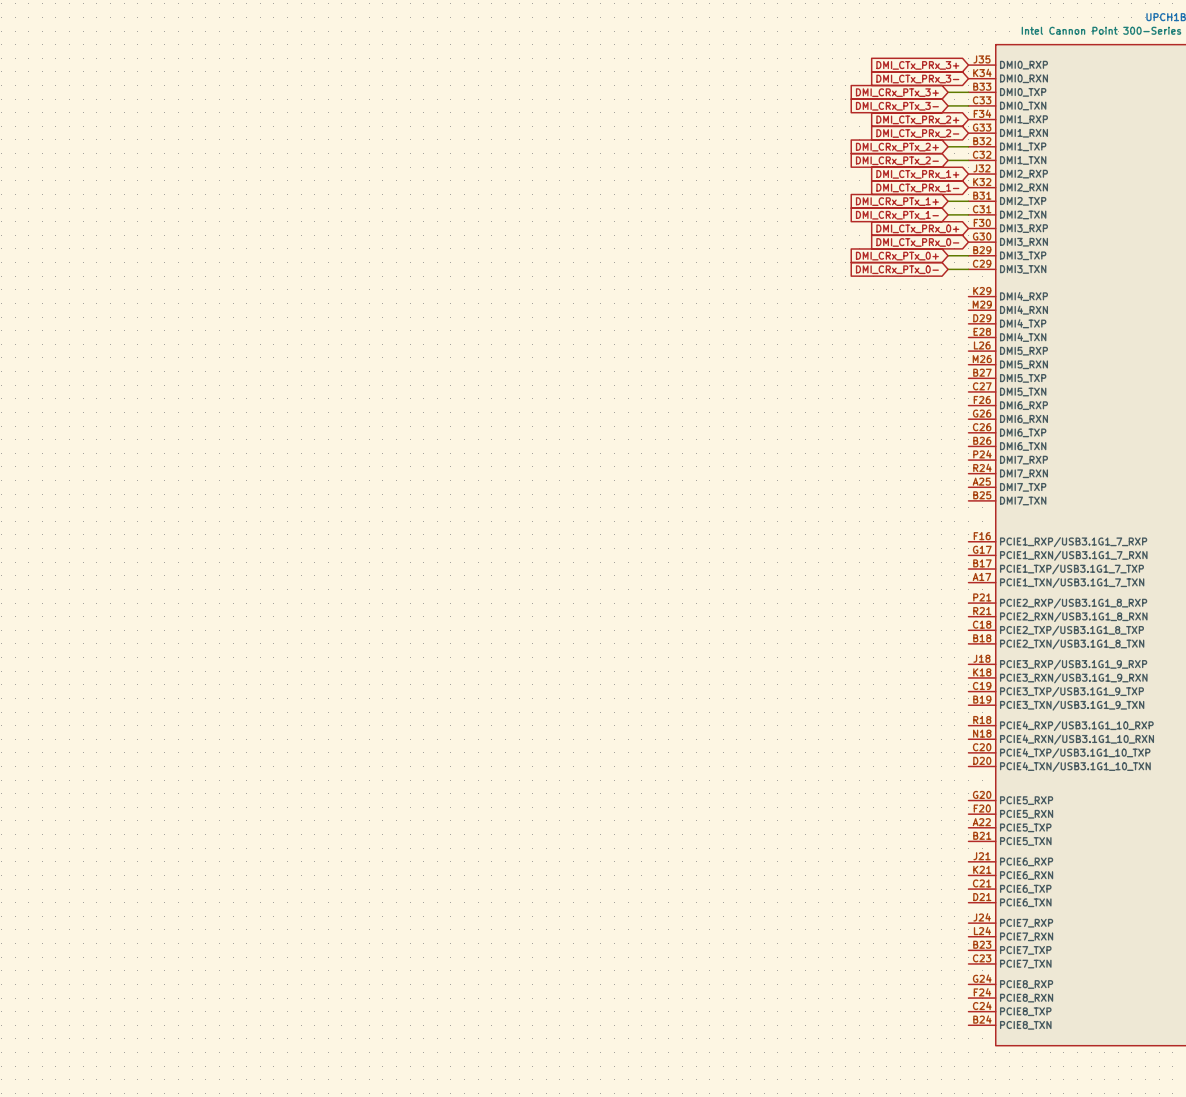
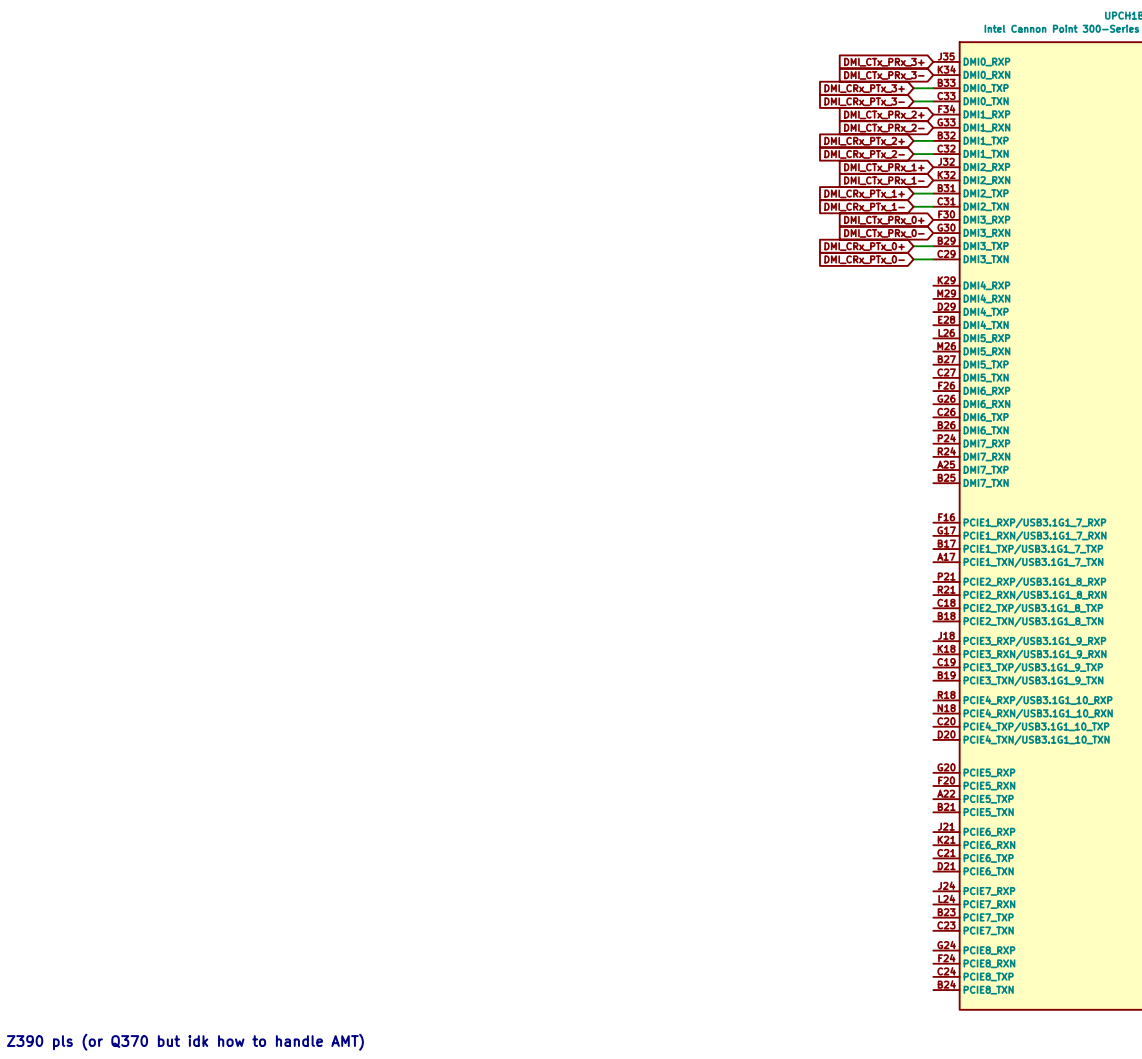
text: none -> Z390 pls (or Q370 but idk how to handle AMT) (185, 1042)

